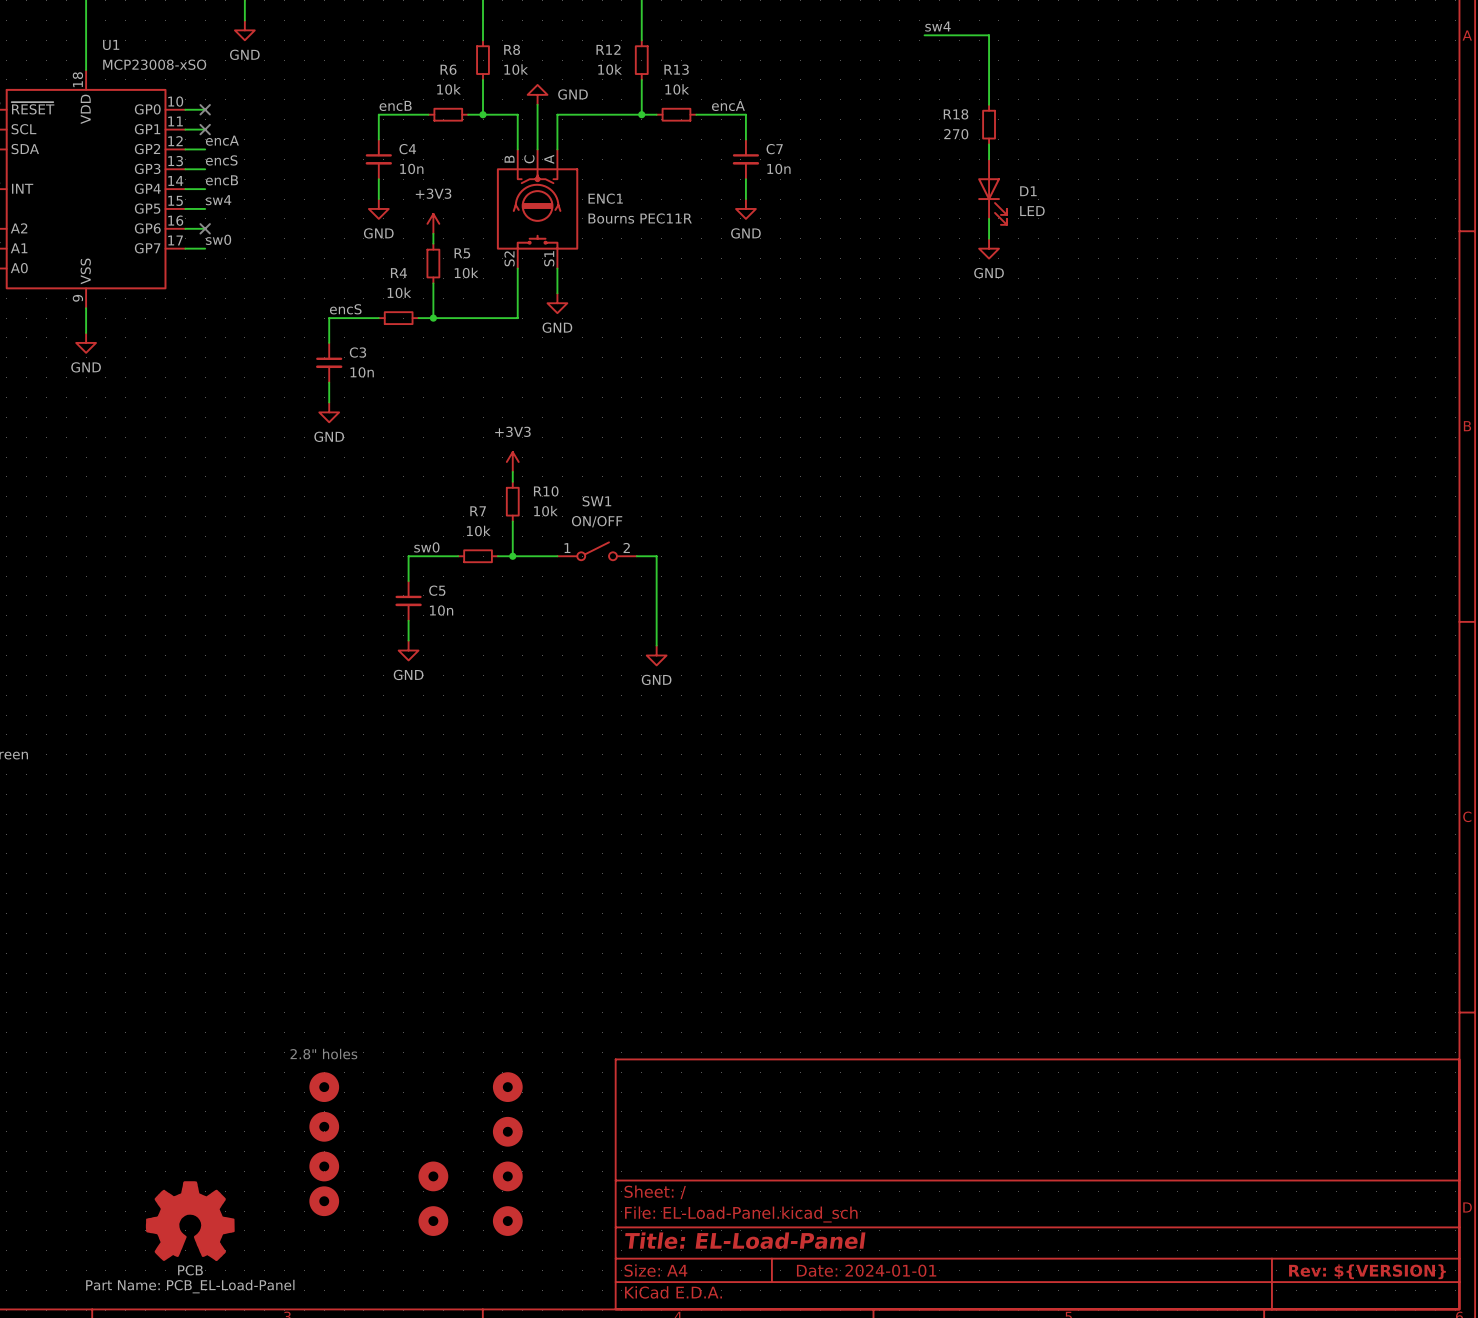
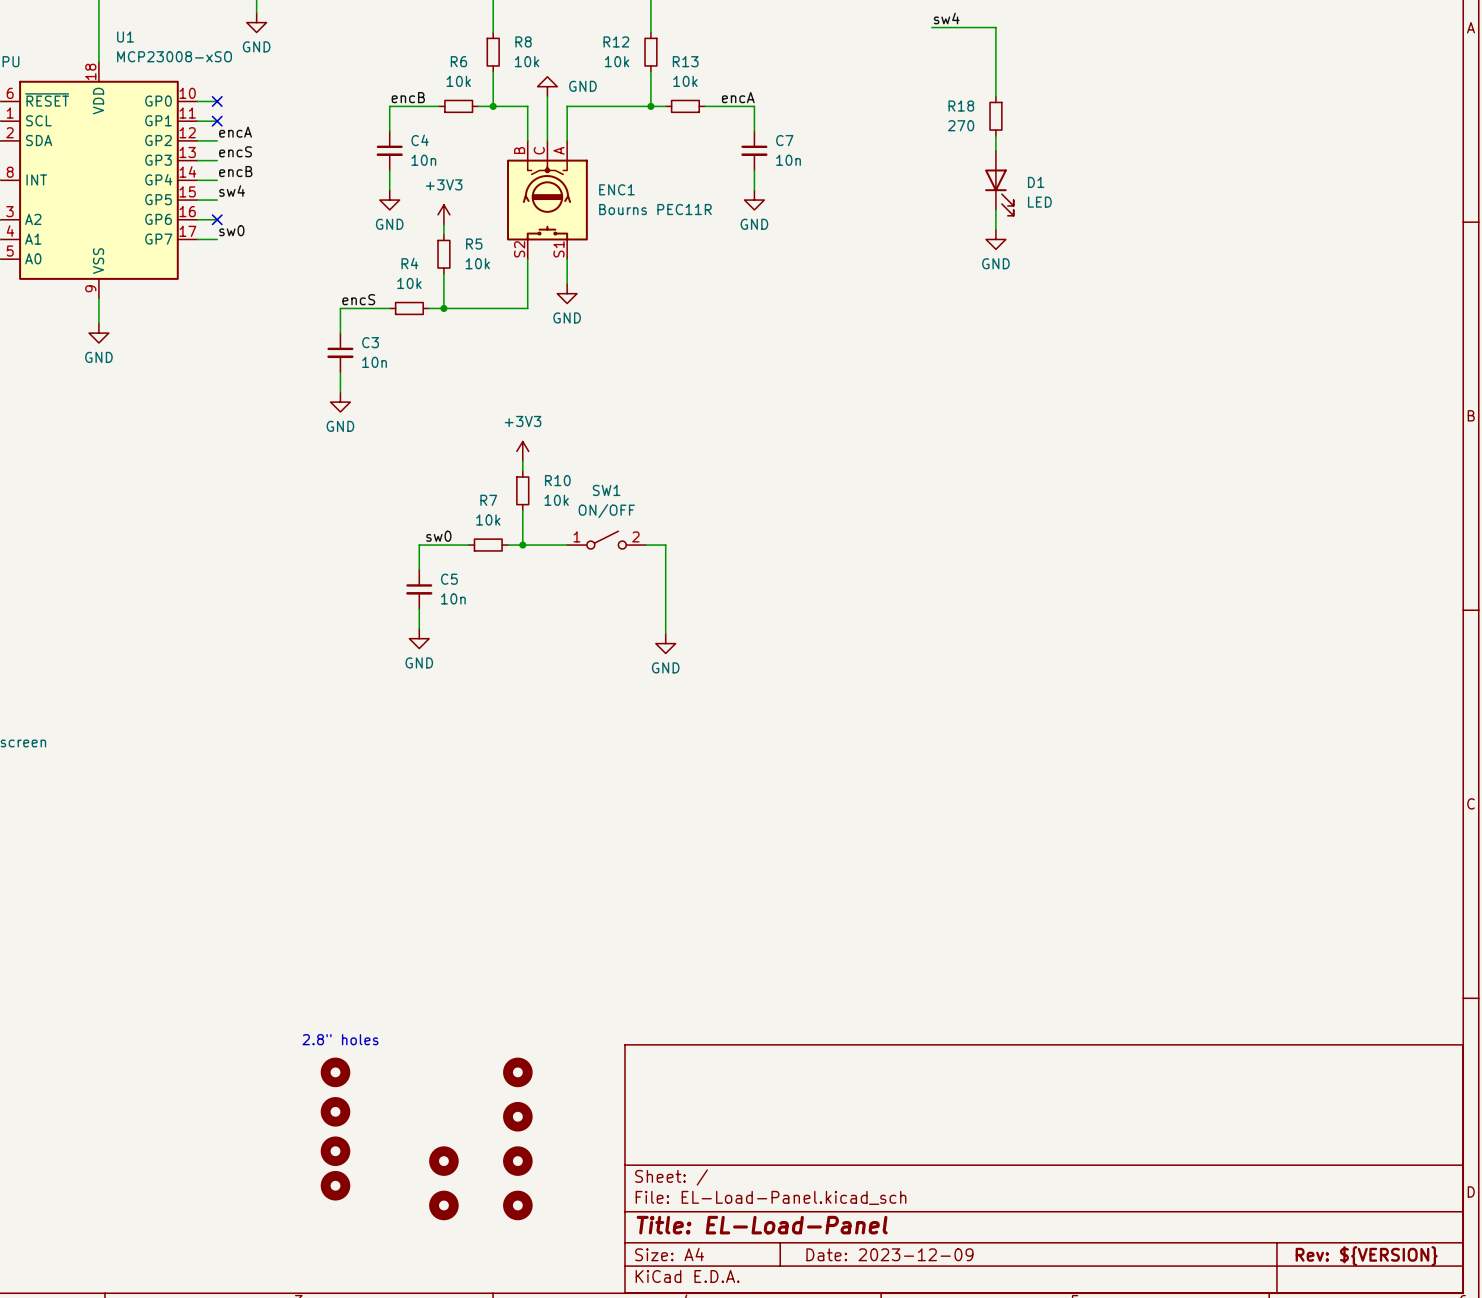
part: PCB (190, 1221) -> none
title block: Date: 2024-01-01 (866, 1270) -> Date: 2023-12-09 (889, 1254)

